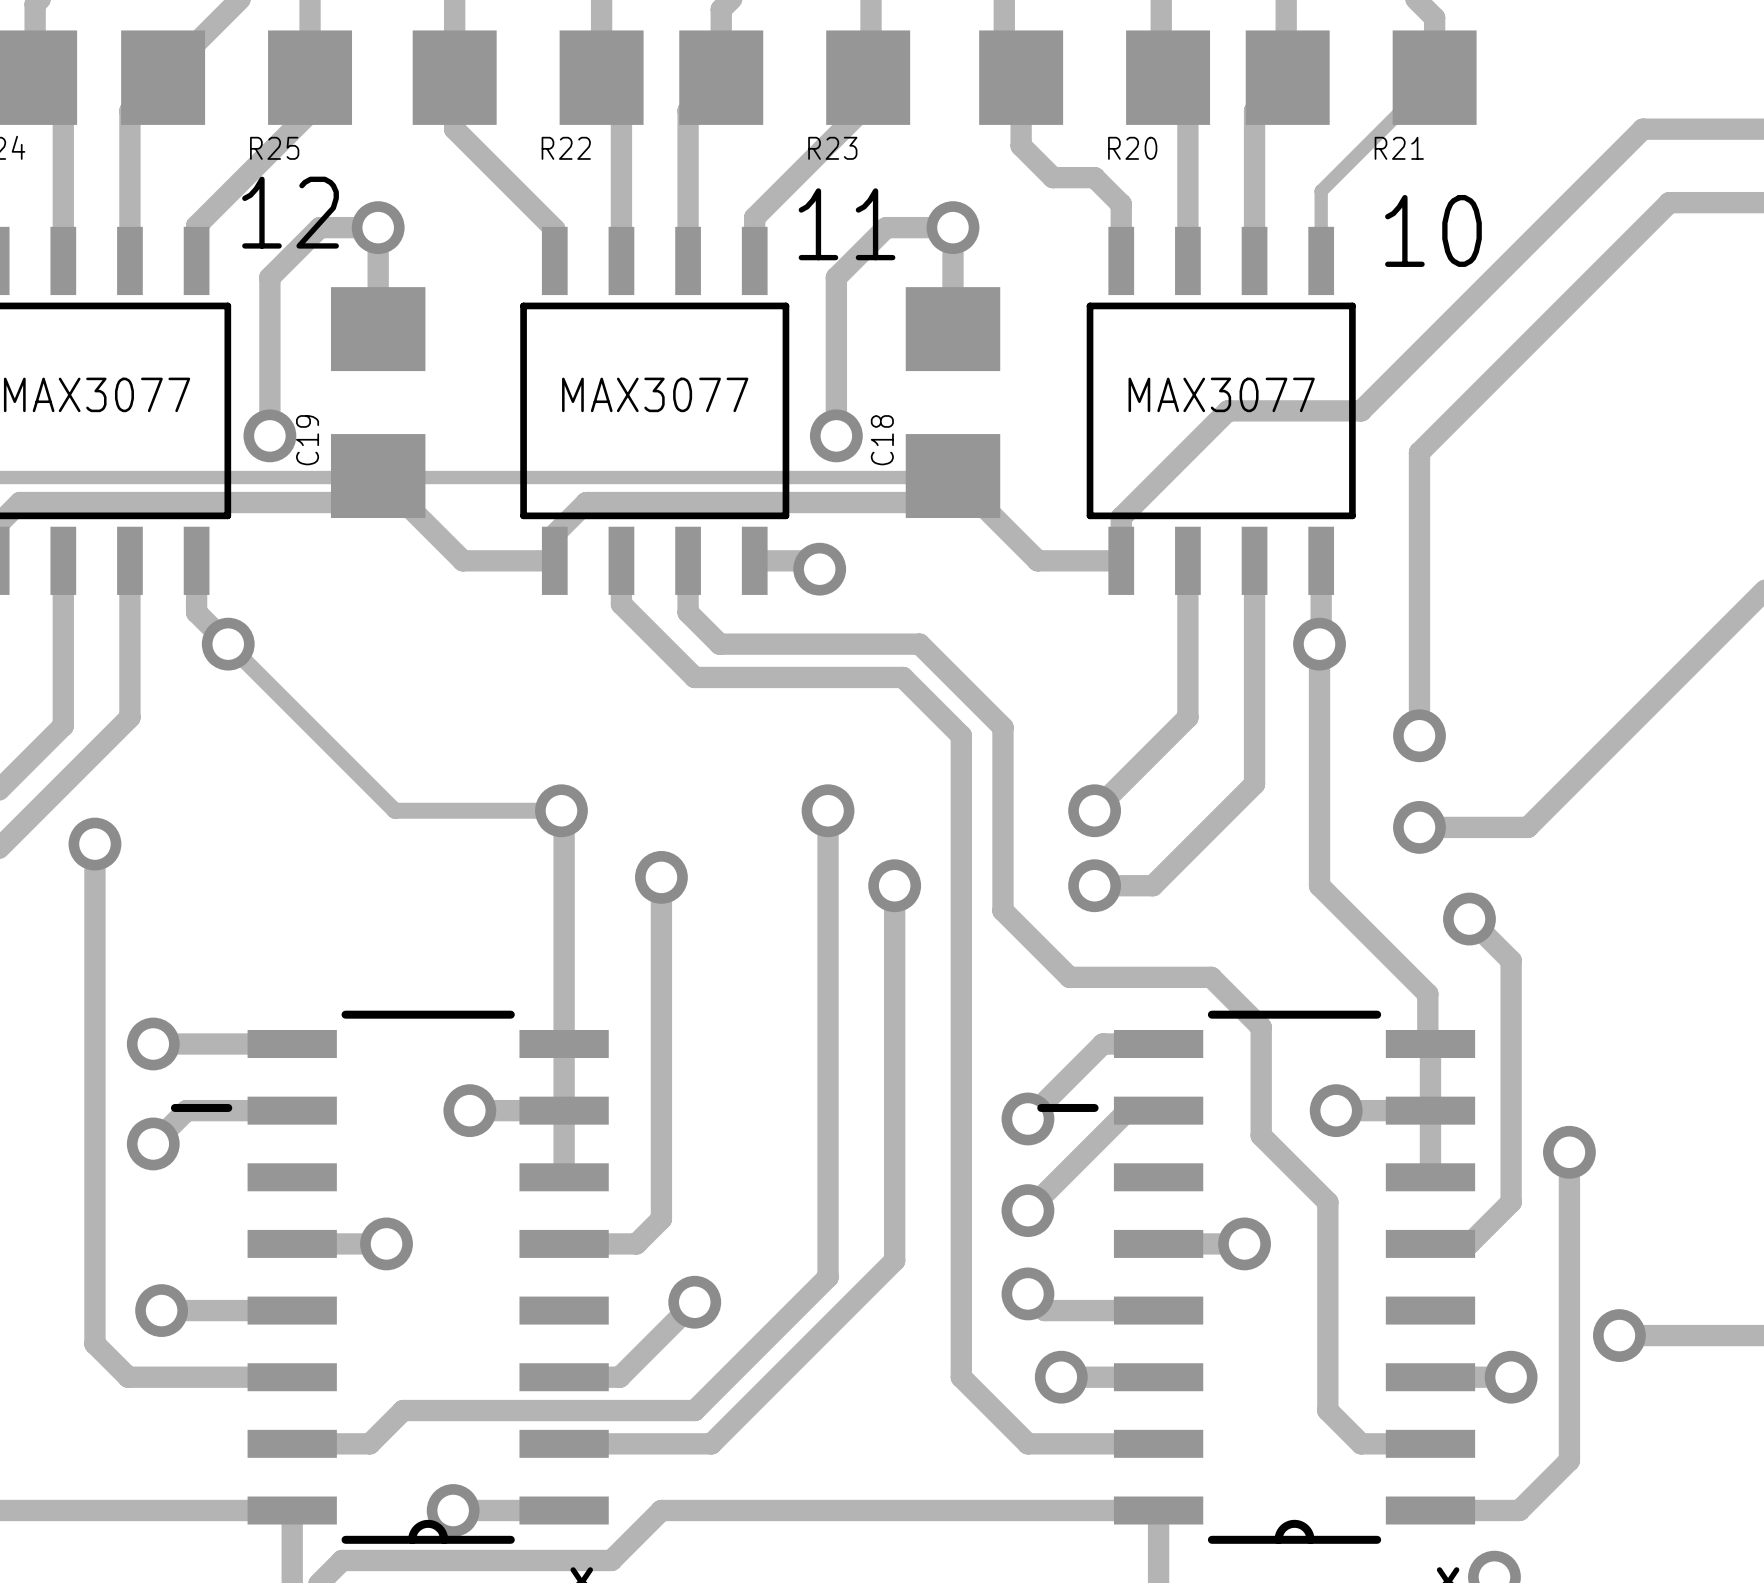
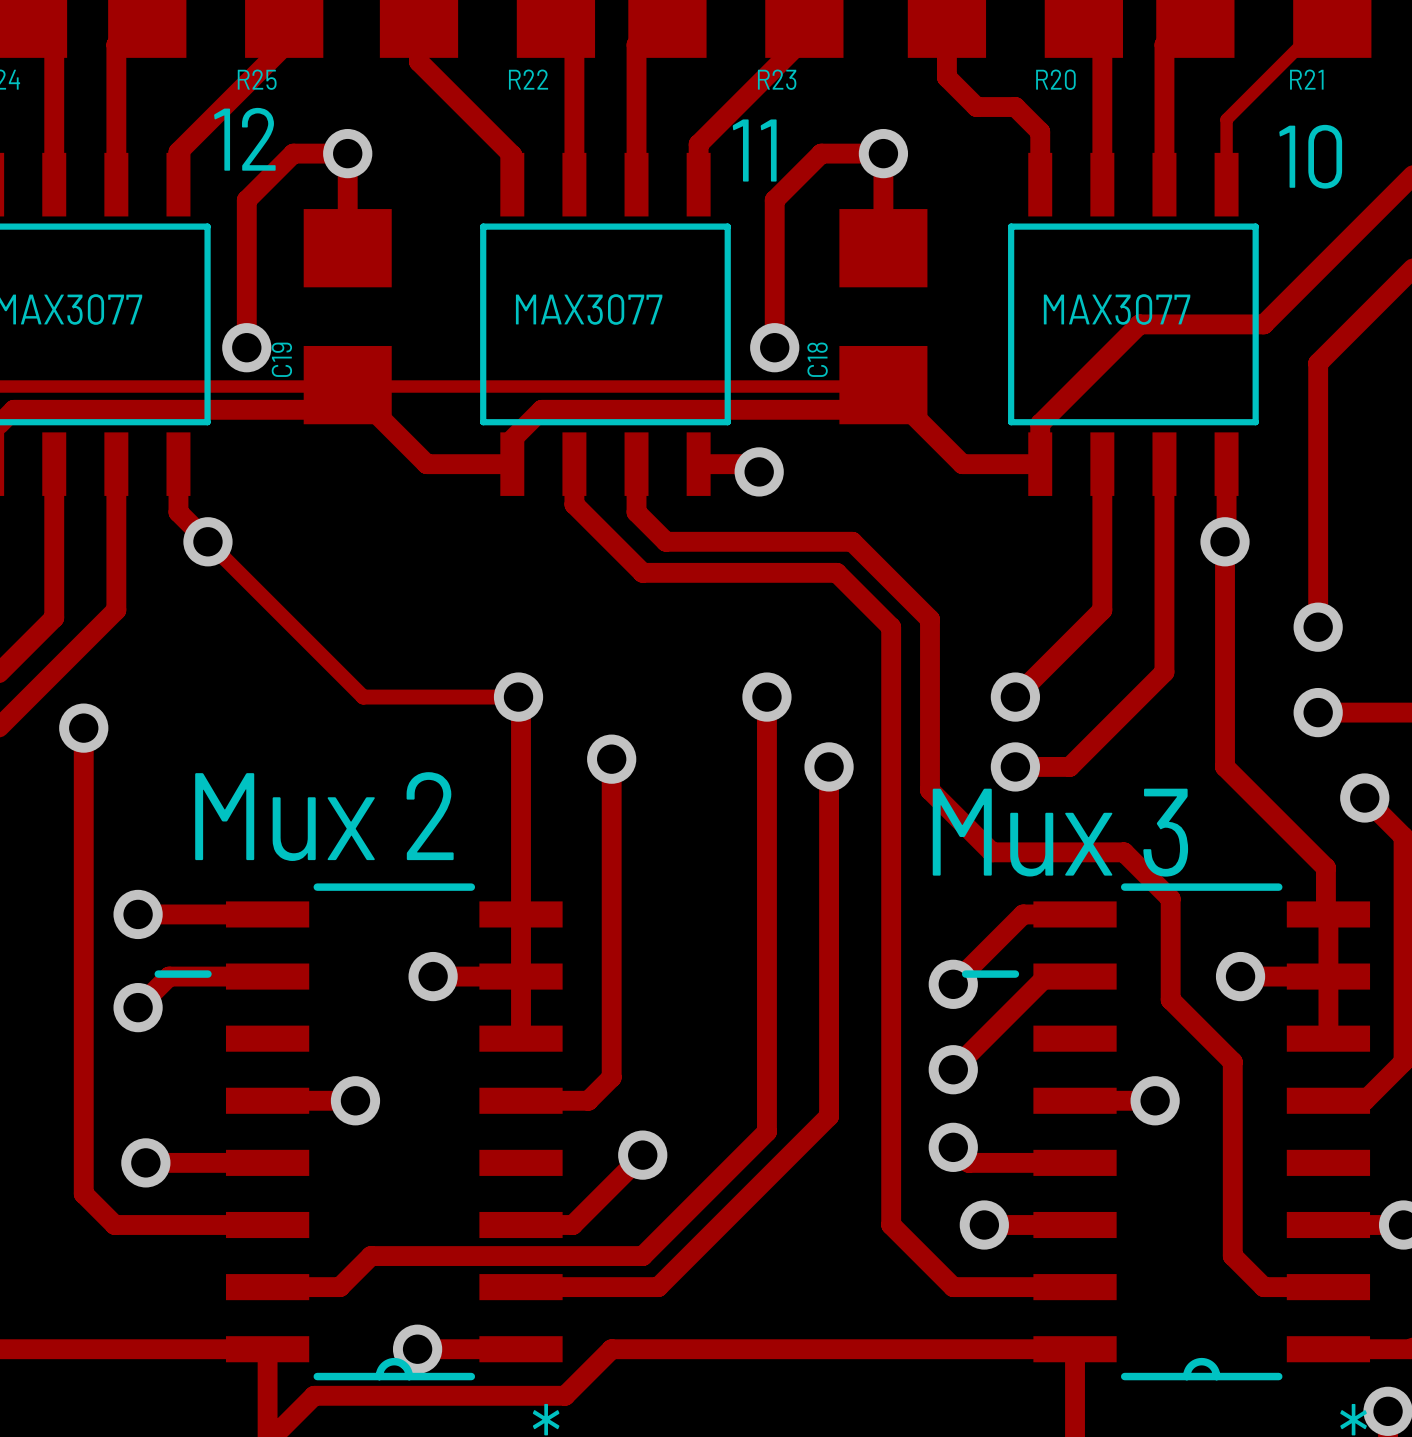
text: none -> Mux 2 (324, 816)
text: none -> Mux 3 (1060, 832)

